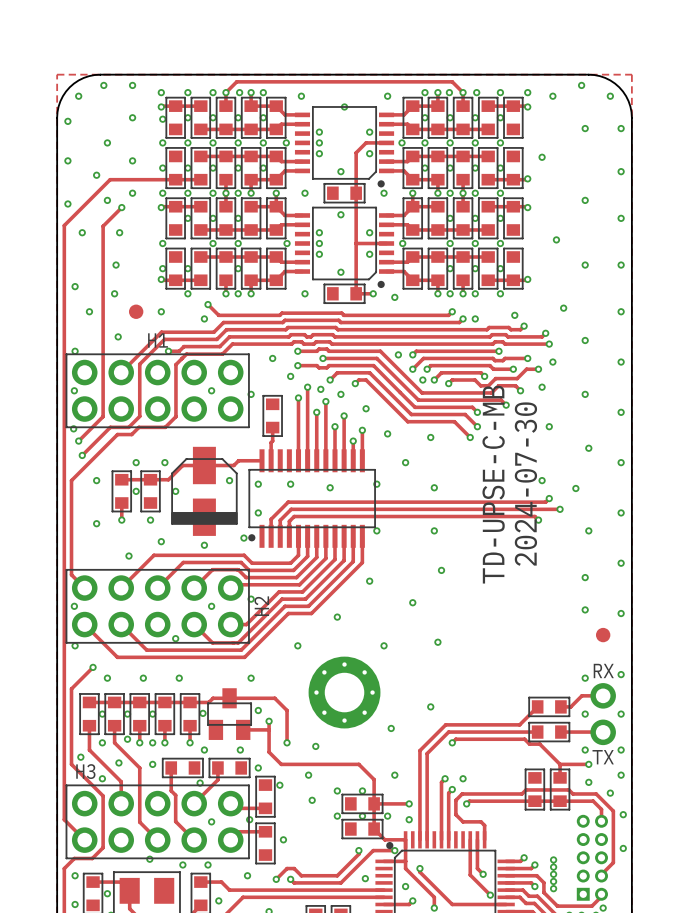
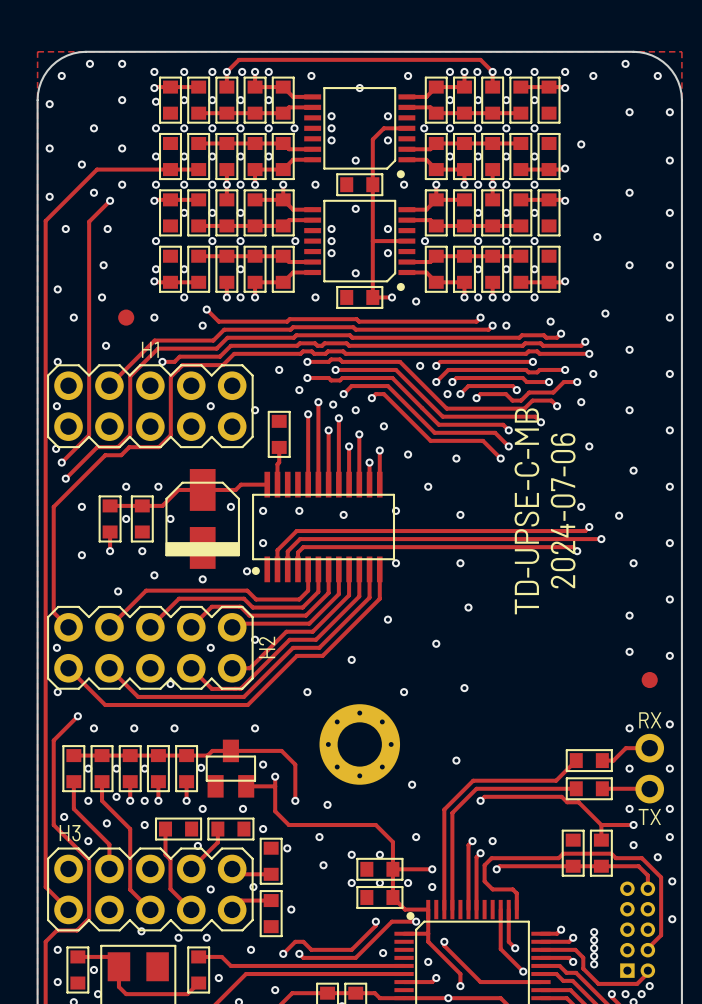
H1 footprint: [65, 353, 250, 429] -> [47, 364, 254, 449]
text: 2024-07-30 (525, 484) -> 2024-07-06 (563, 510)
H2 footprint: [65, 568, 250, 644] -> [47, 605, 254, 690]
H3 footprint: [65, 784, 250, 860] -> [47, 847, 254, 932]

